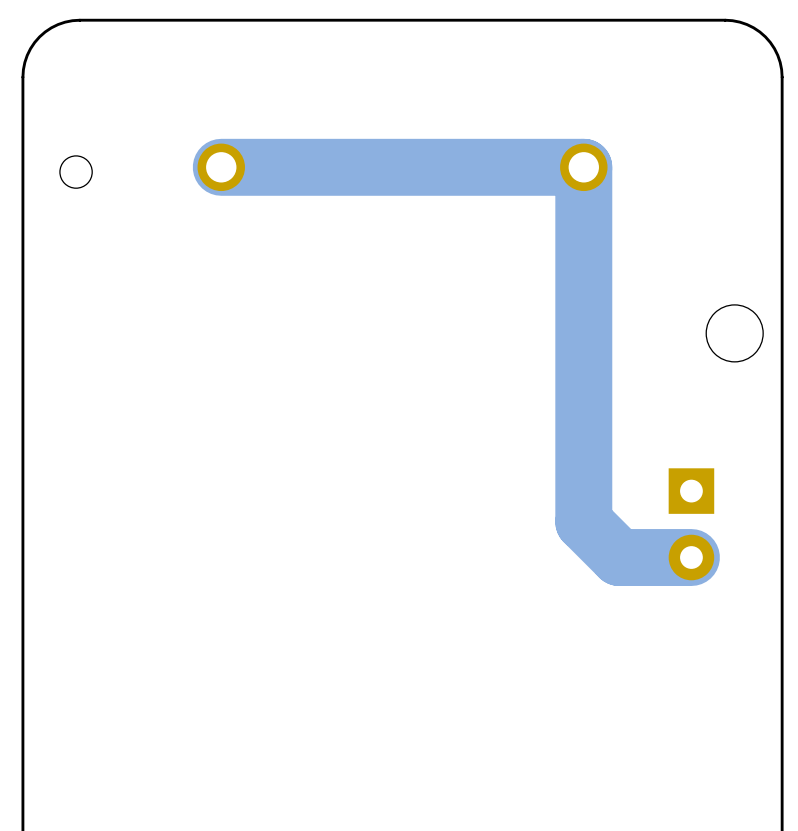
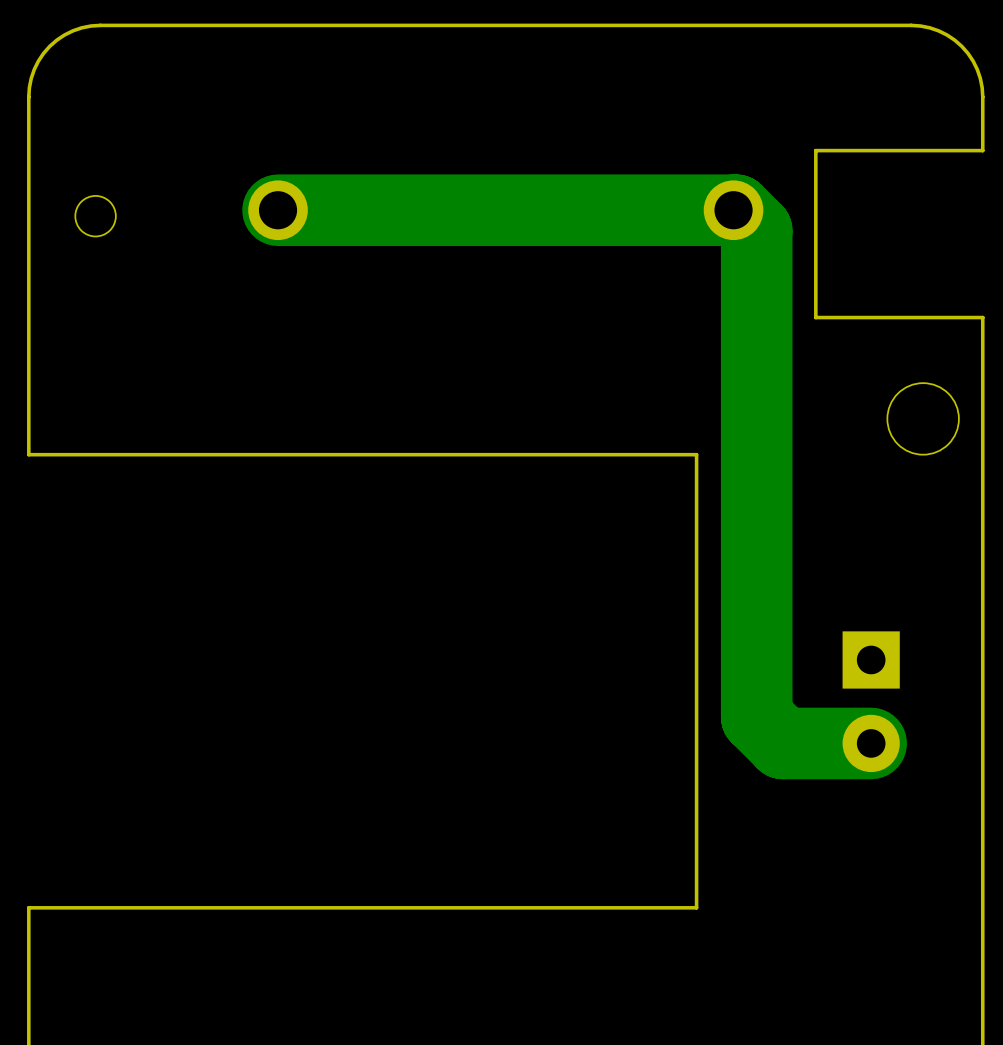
board edge: (782, 119) (782, 252) -> (982, 150) (815, 150) (815, 317) (982, 317)
track: (583, 167) (583, 521) (619, 557) (691, 557) -> (733, 210) (736, 210) (756, 230) (756, 717) (782, 743) (871, 743)
board edge: (22, 361) (22, 722) -> (28, 454) (696, 454) (696, 907) (28, 907)
part position: (691, 524) -> (871, 701)

